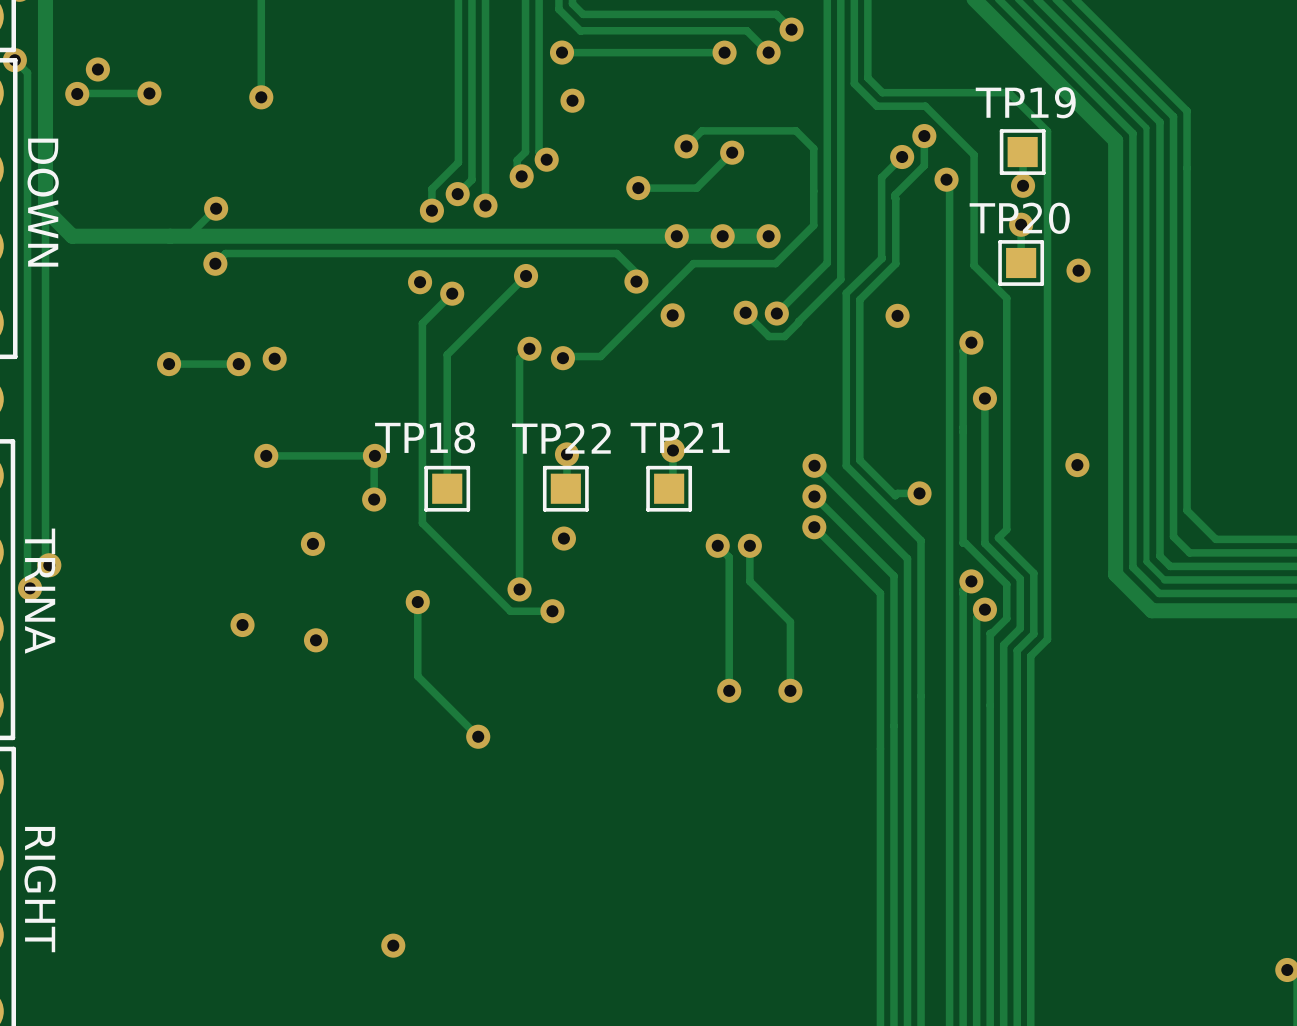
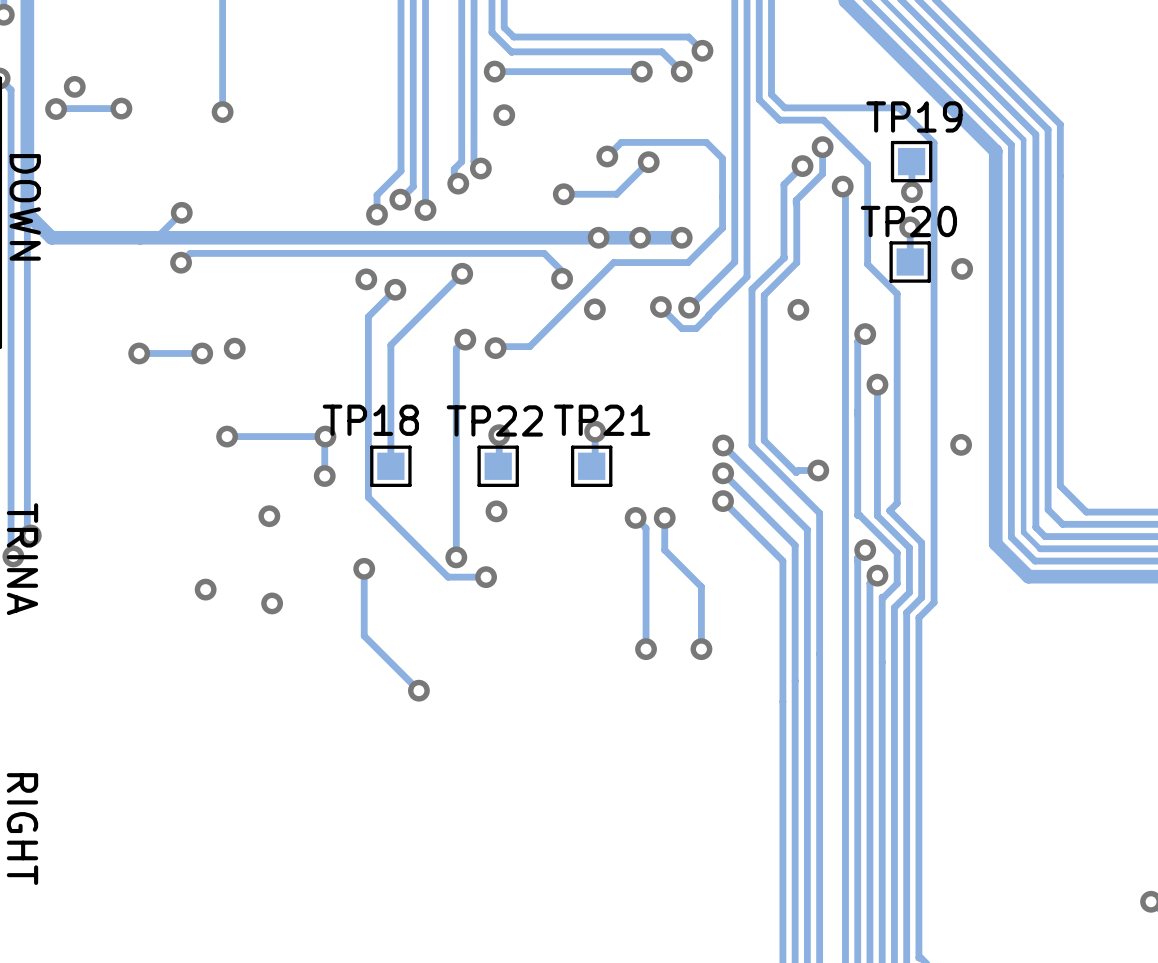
via: (393, 945) -> none

